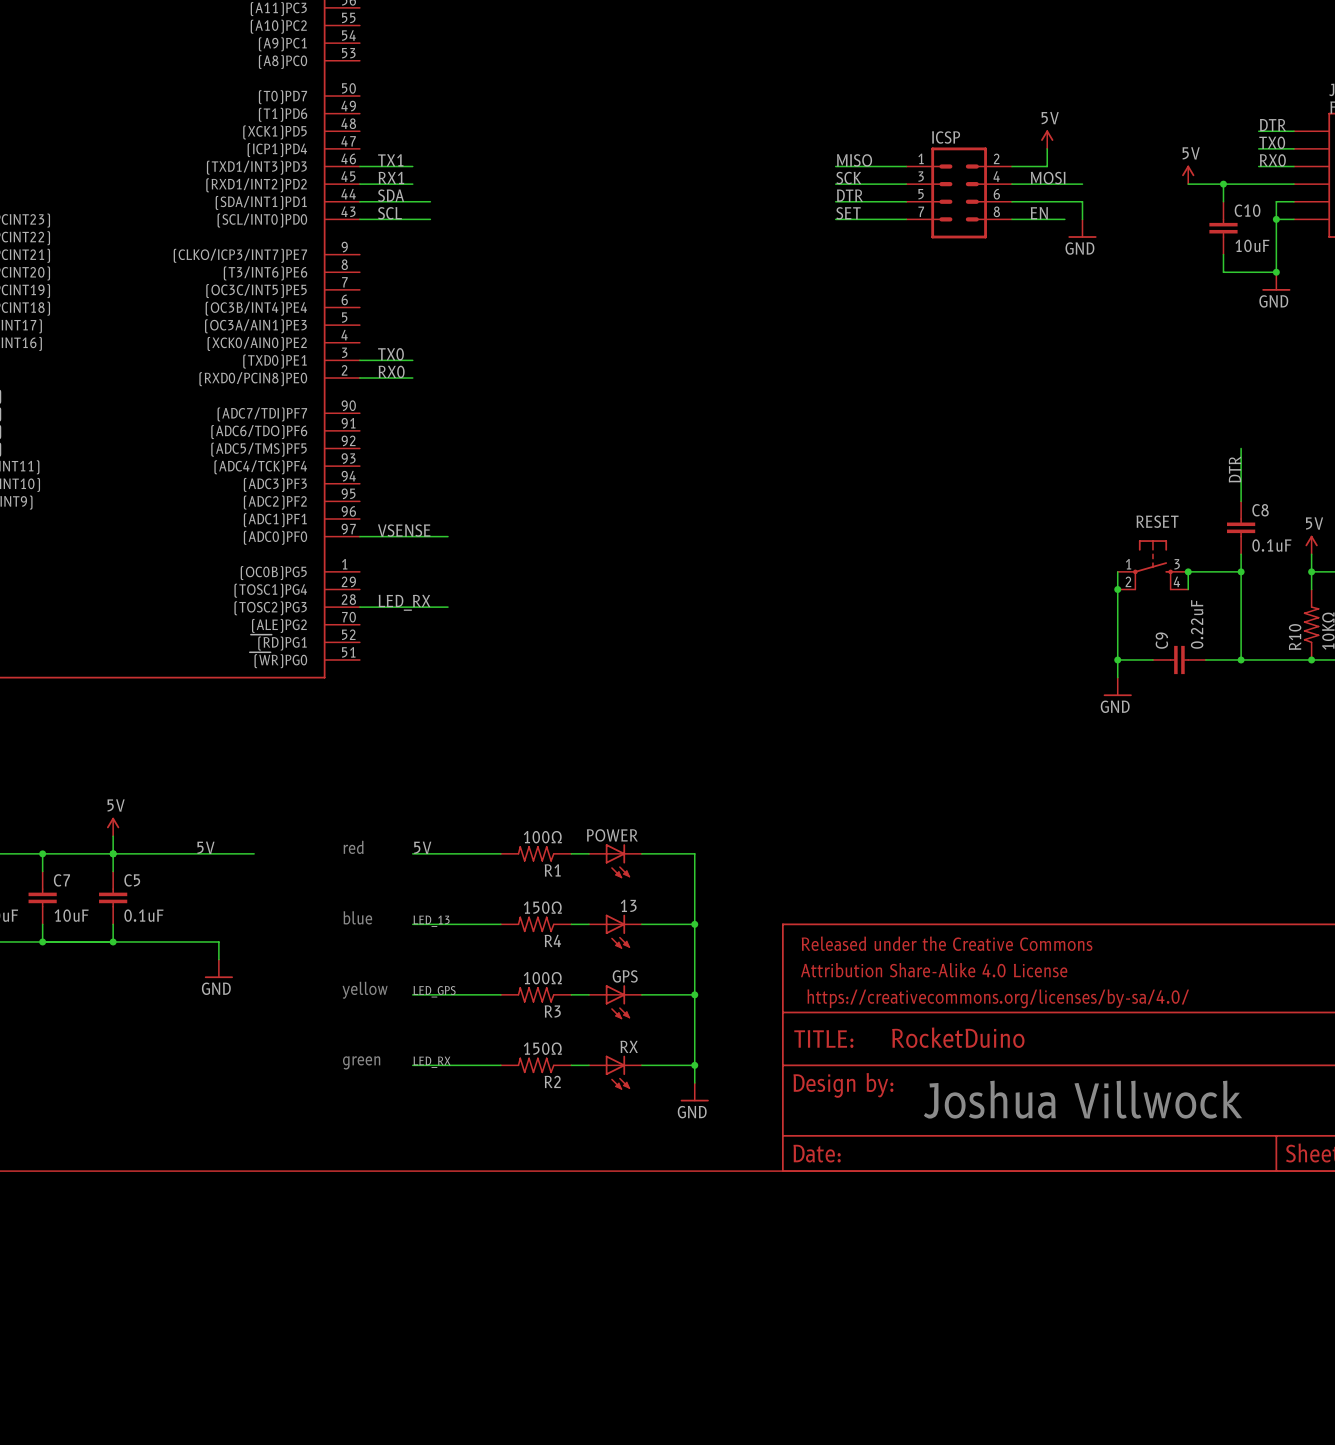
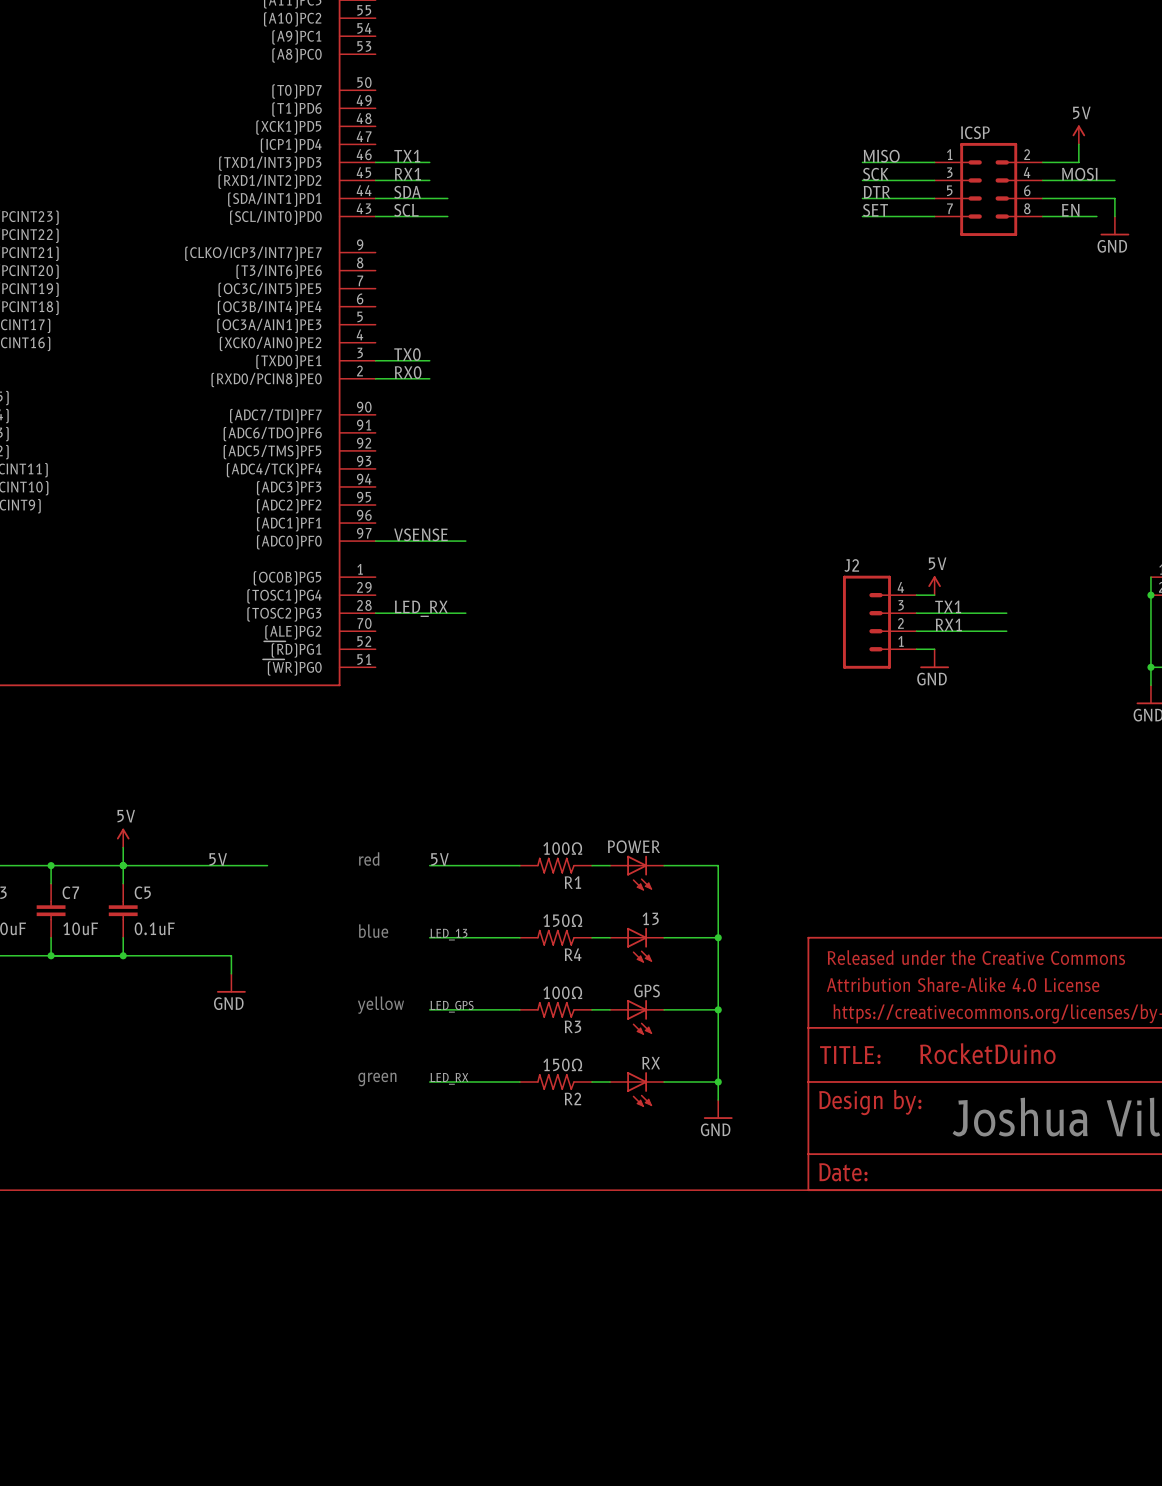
power symbol: none -> 5V (934, 585)
wire: none -> (916, 595) (934, 595)
label: none -> TX1 (948, 606)
wire: none -> (916, 613) (1006, 613)
J2: none -> (879, 622)
label: none -> RX1 (948, 624)
wire: none -> (916, 631) (1006, 631)
wire: none -> (916, 649) (934, 649)
power symbol: none -> GND (934, 658)

